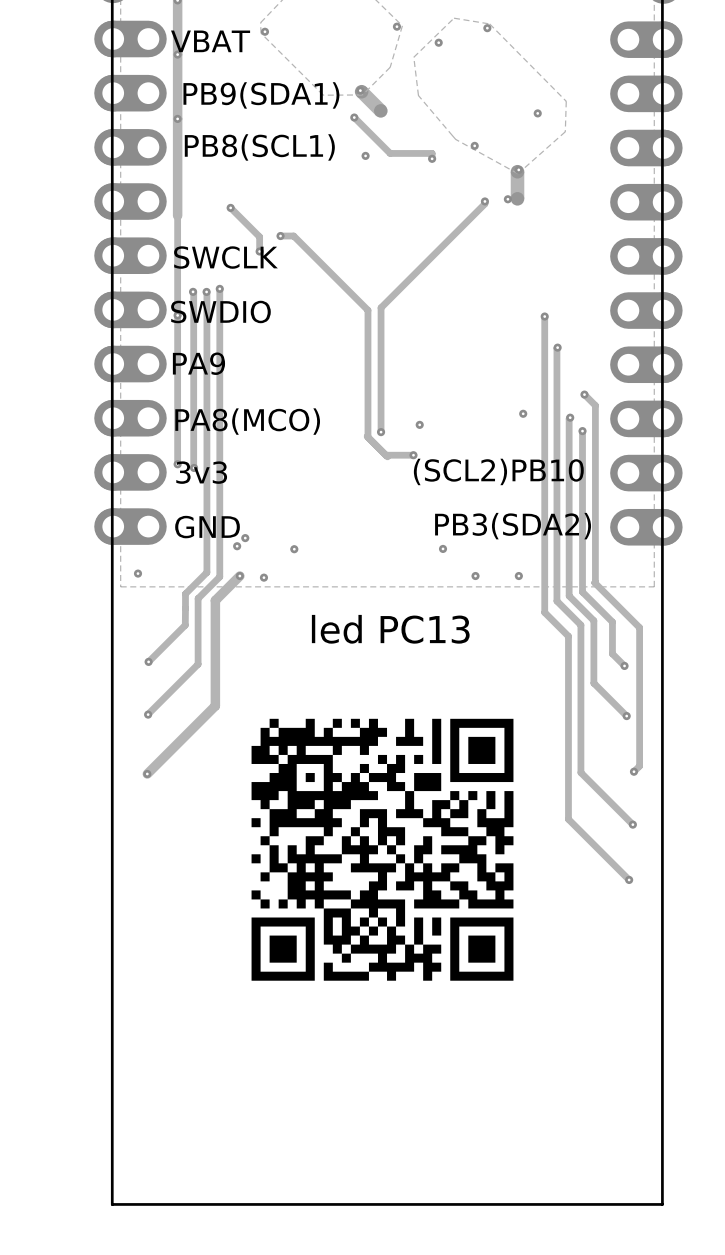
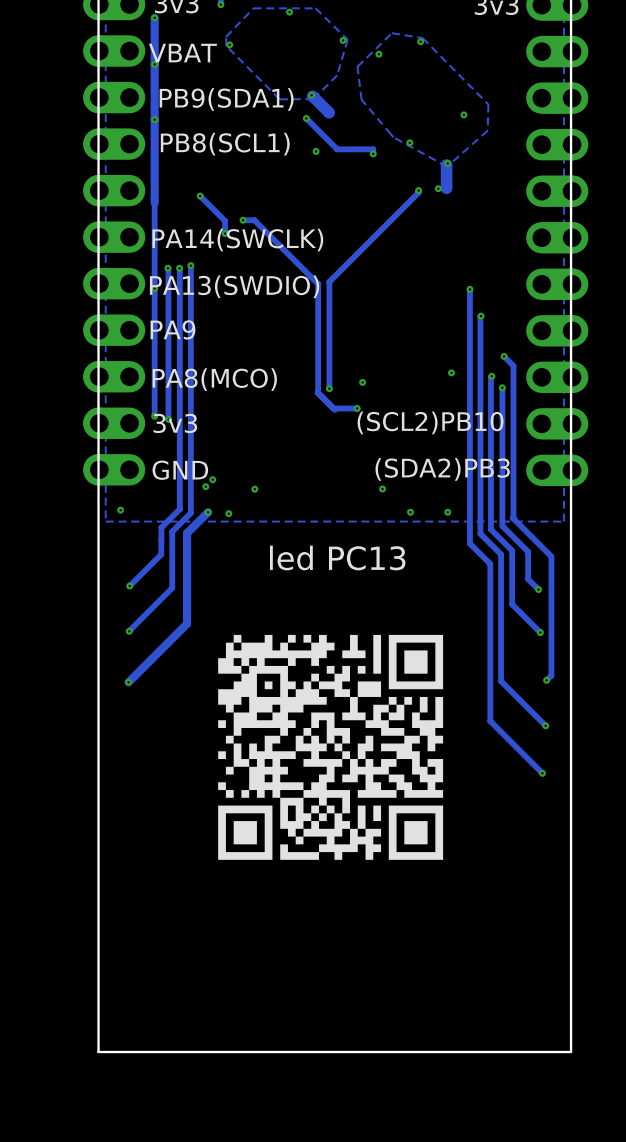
text: SWCLK (225, 257) -> PA14(SWCLK) (237, 240)
text: SWDIO (220, 311) -> PA13(SWDIO) (234, 286)
text: PB3(SDA2) (513, 526) -> (SDA2)PB3 (442, 469)

